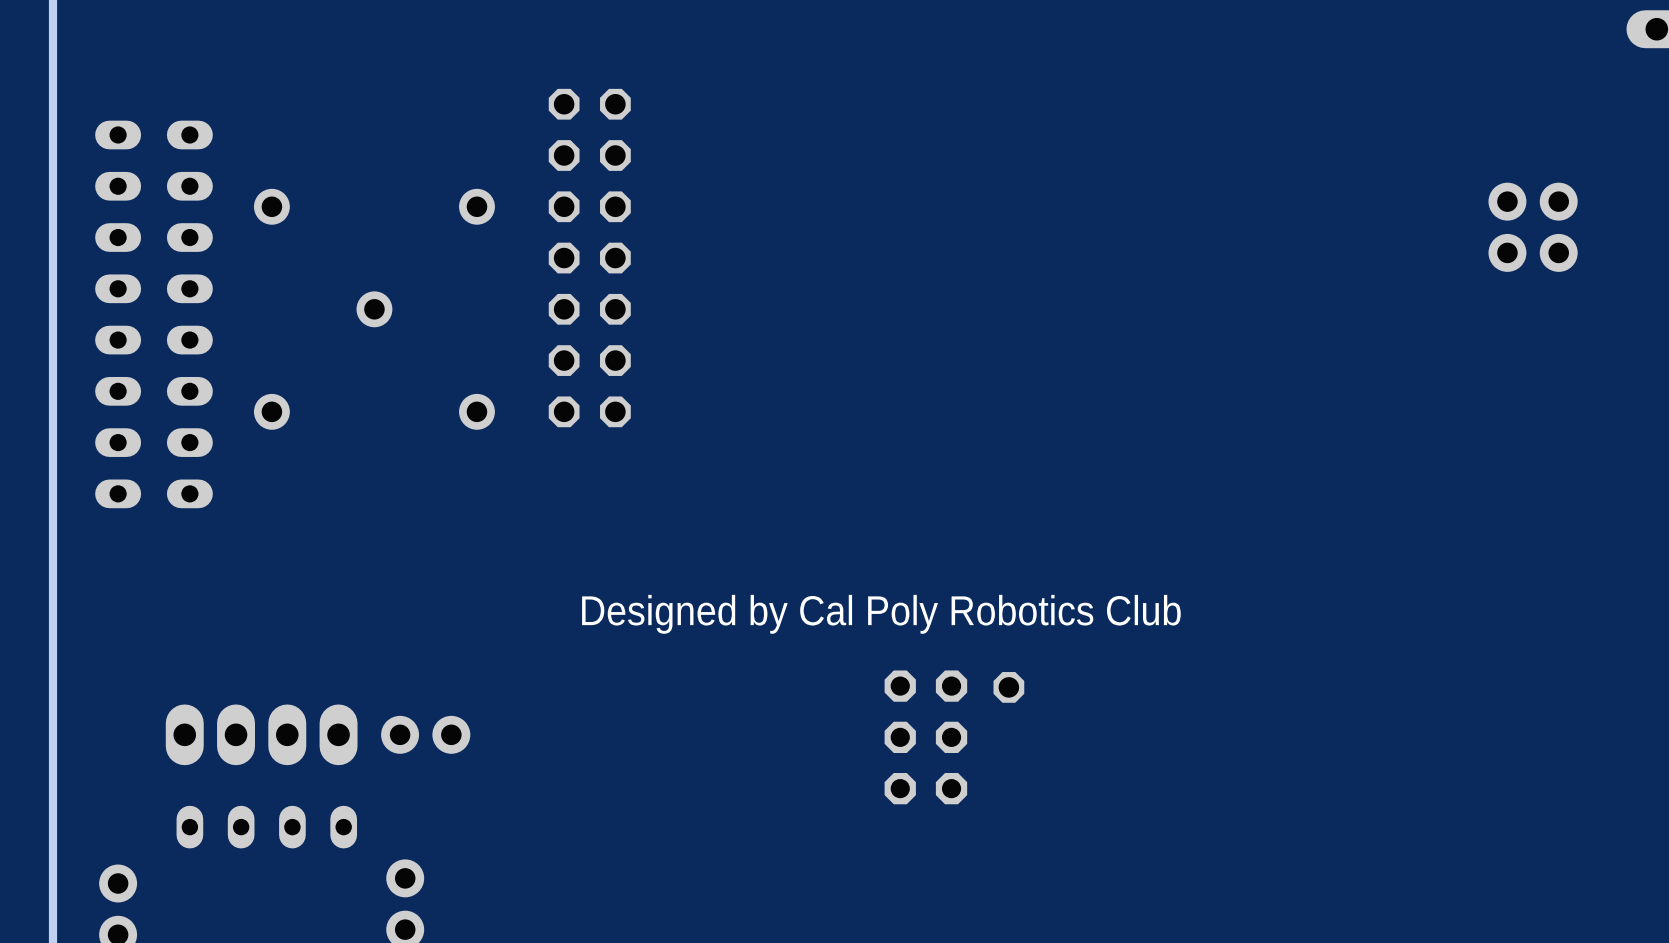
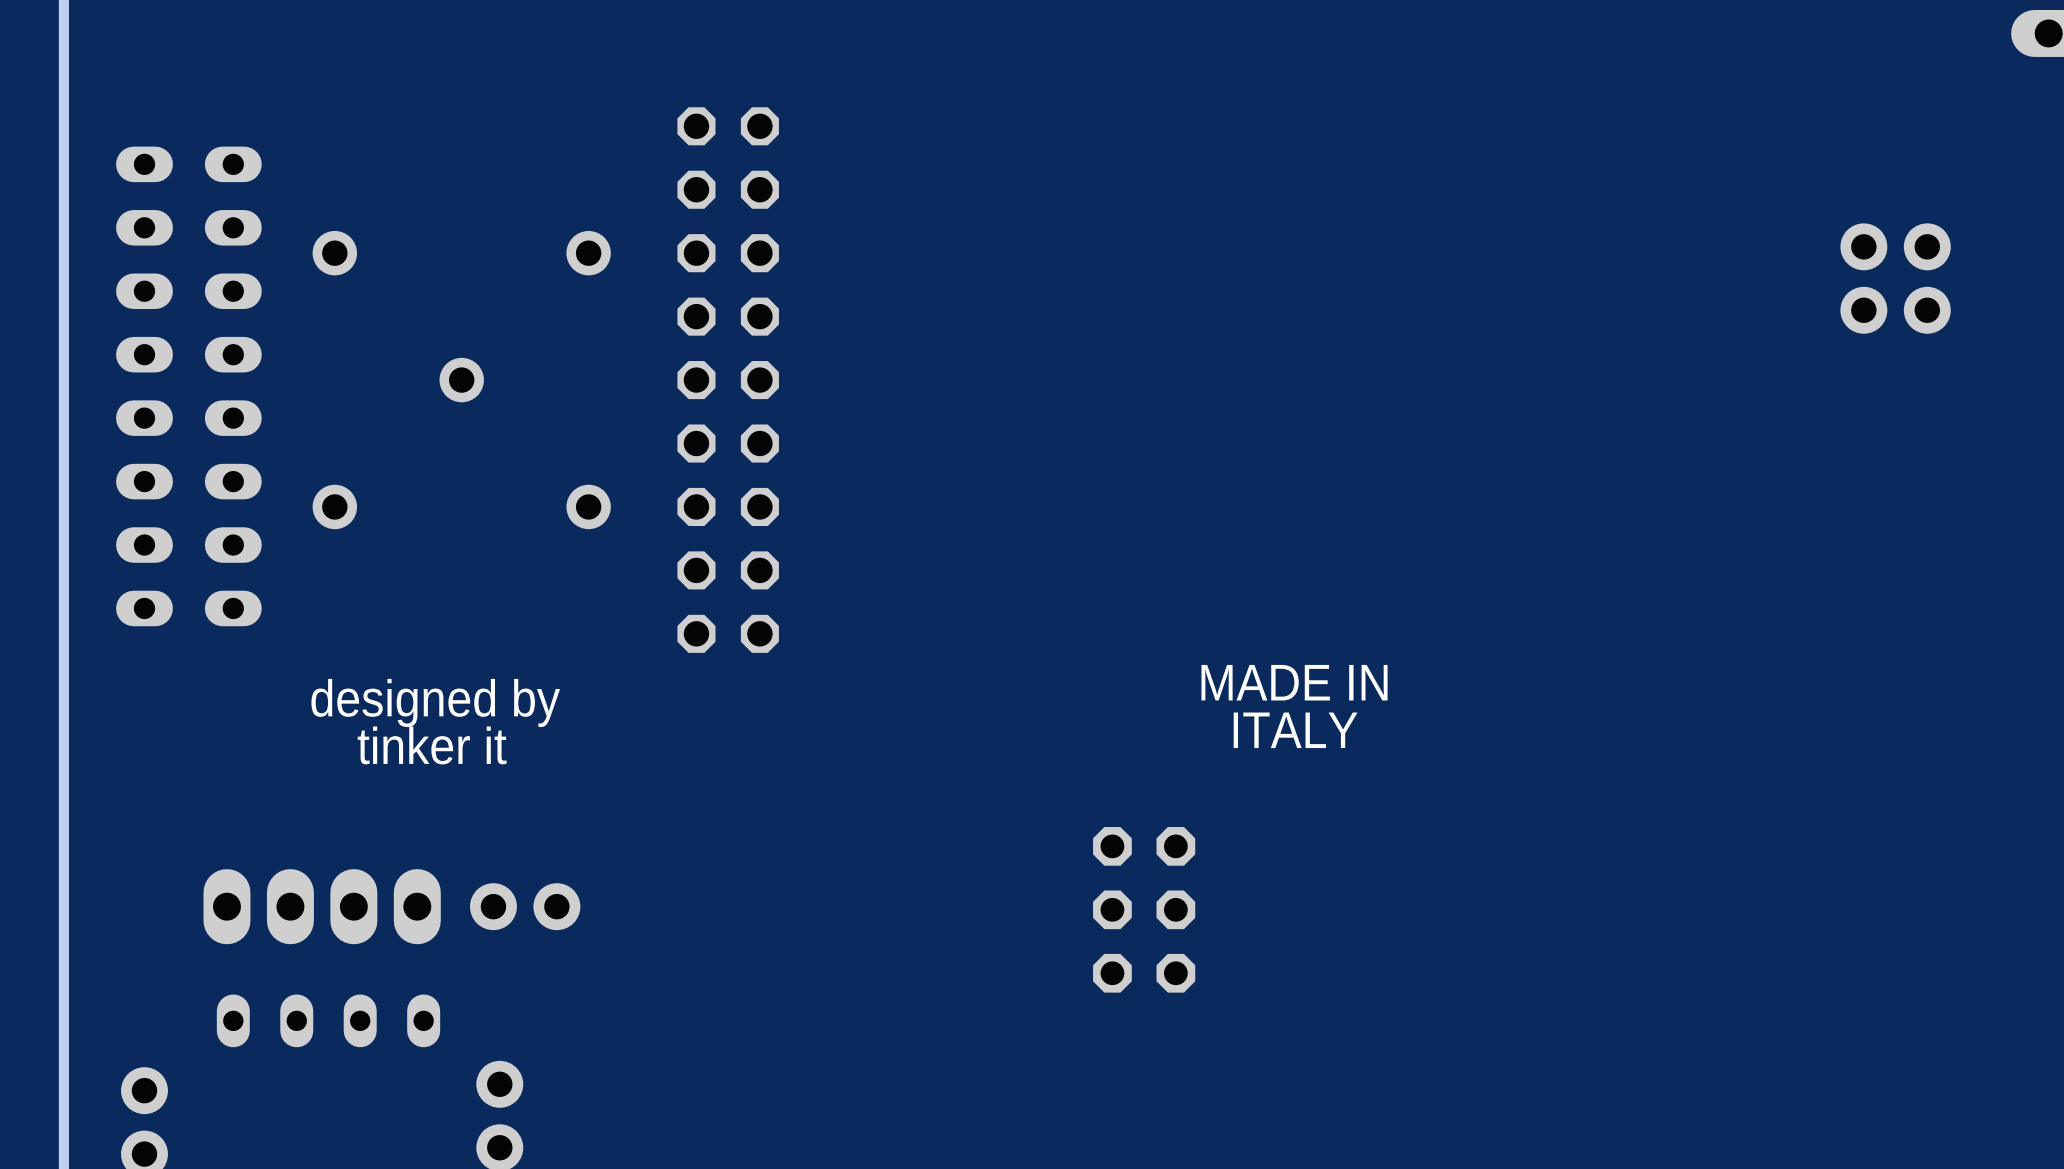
part: none -> (728, 380)
text: none -> MADE IN (1294, 682)
text: none -> designed by (435, 702)
text: none -> ITALY (1295, 730)
text: none -> tinker it (432, 745)
text: Designed by Cal Poly Robotics Club (881, 614) -> none
part: (1008, 687) -> none

